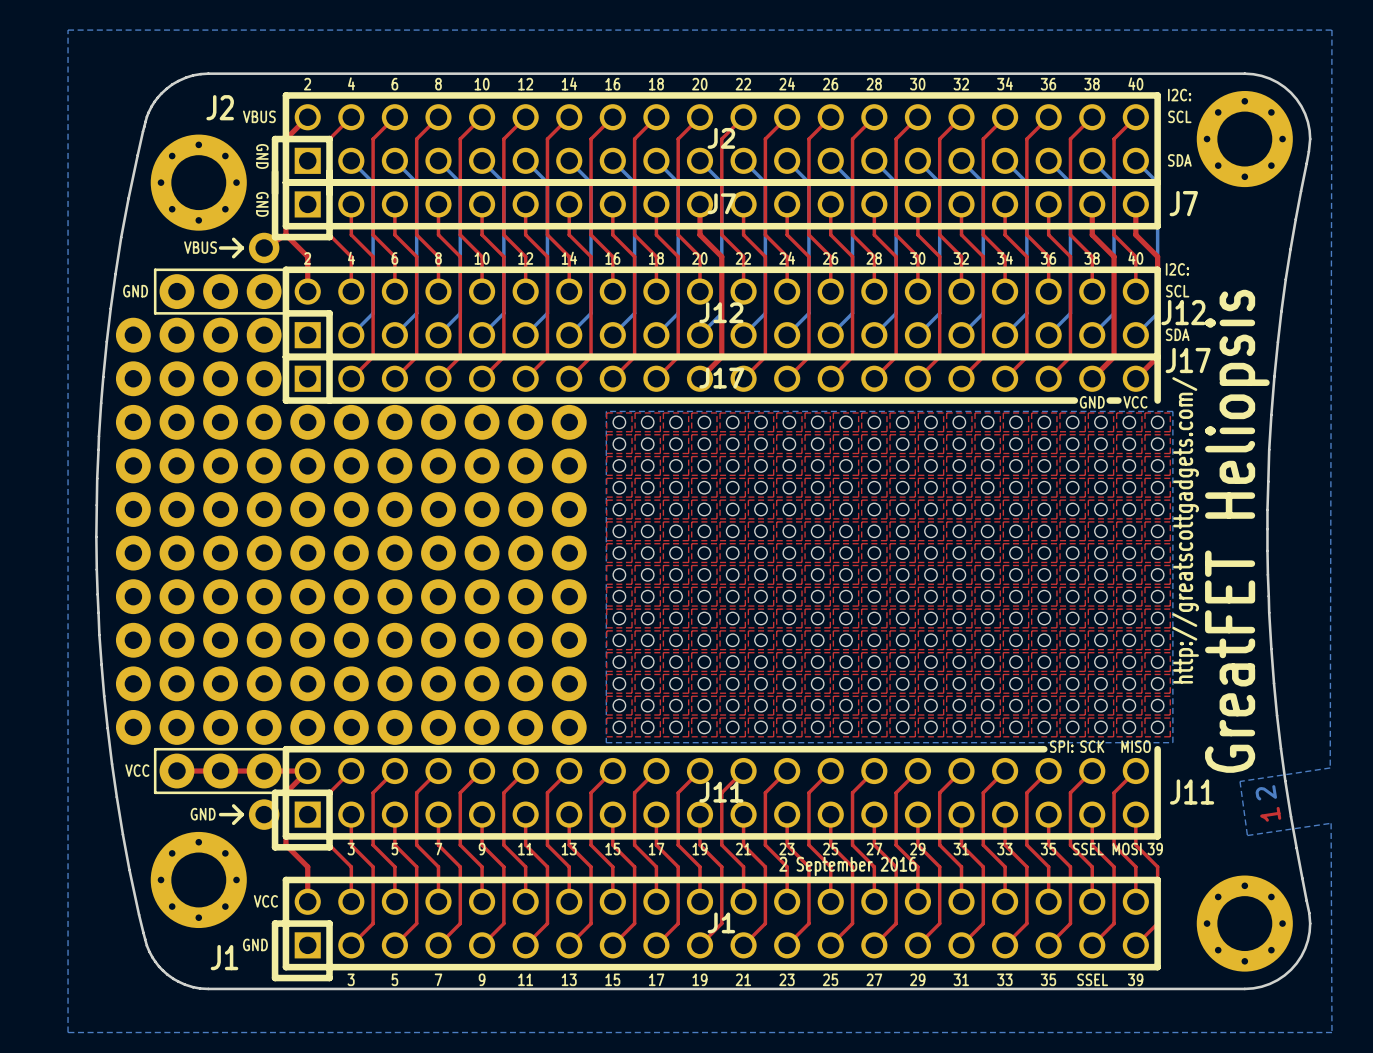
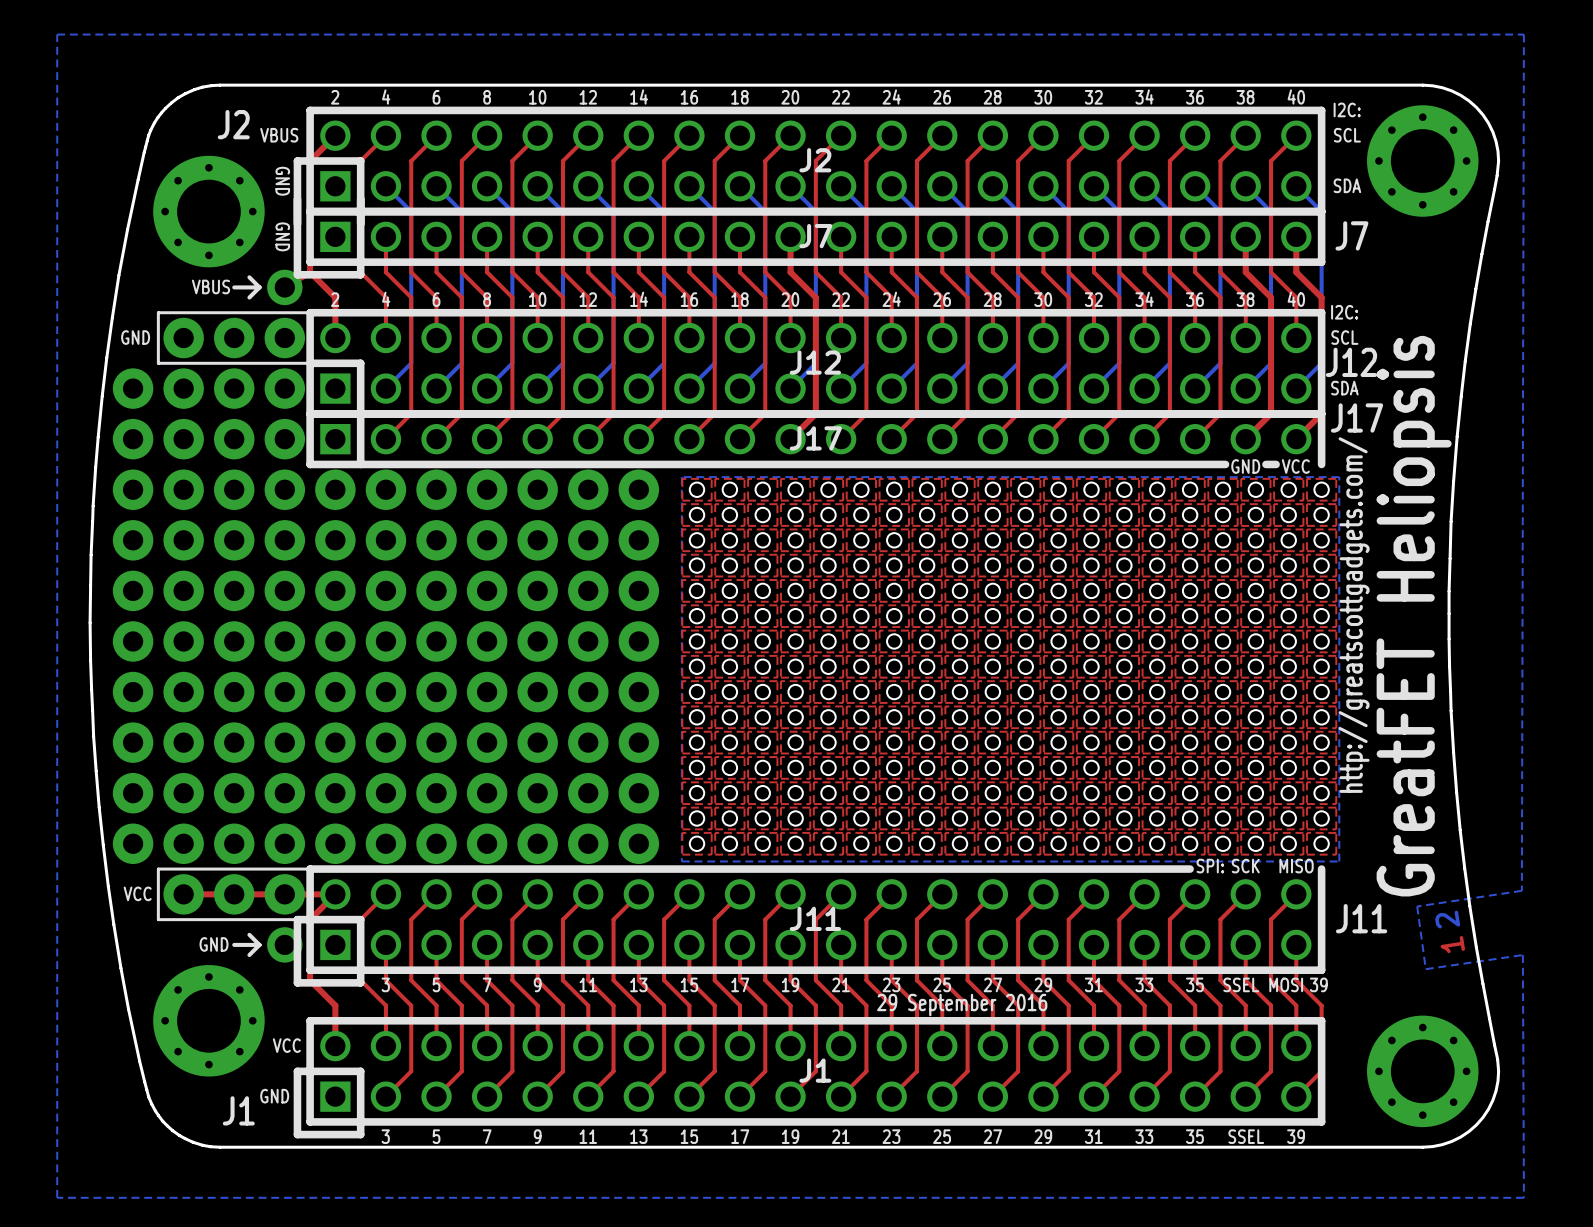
text: 2 September 2016 (847, 866) -> 29 September 2016 (962, 1005)

